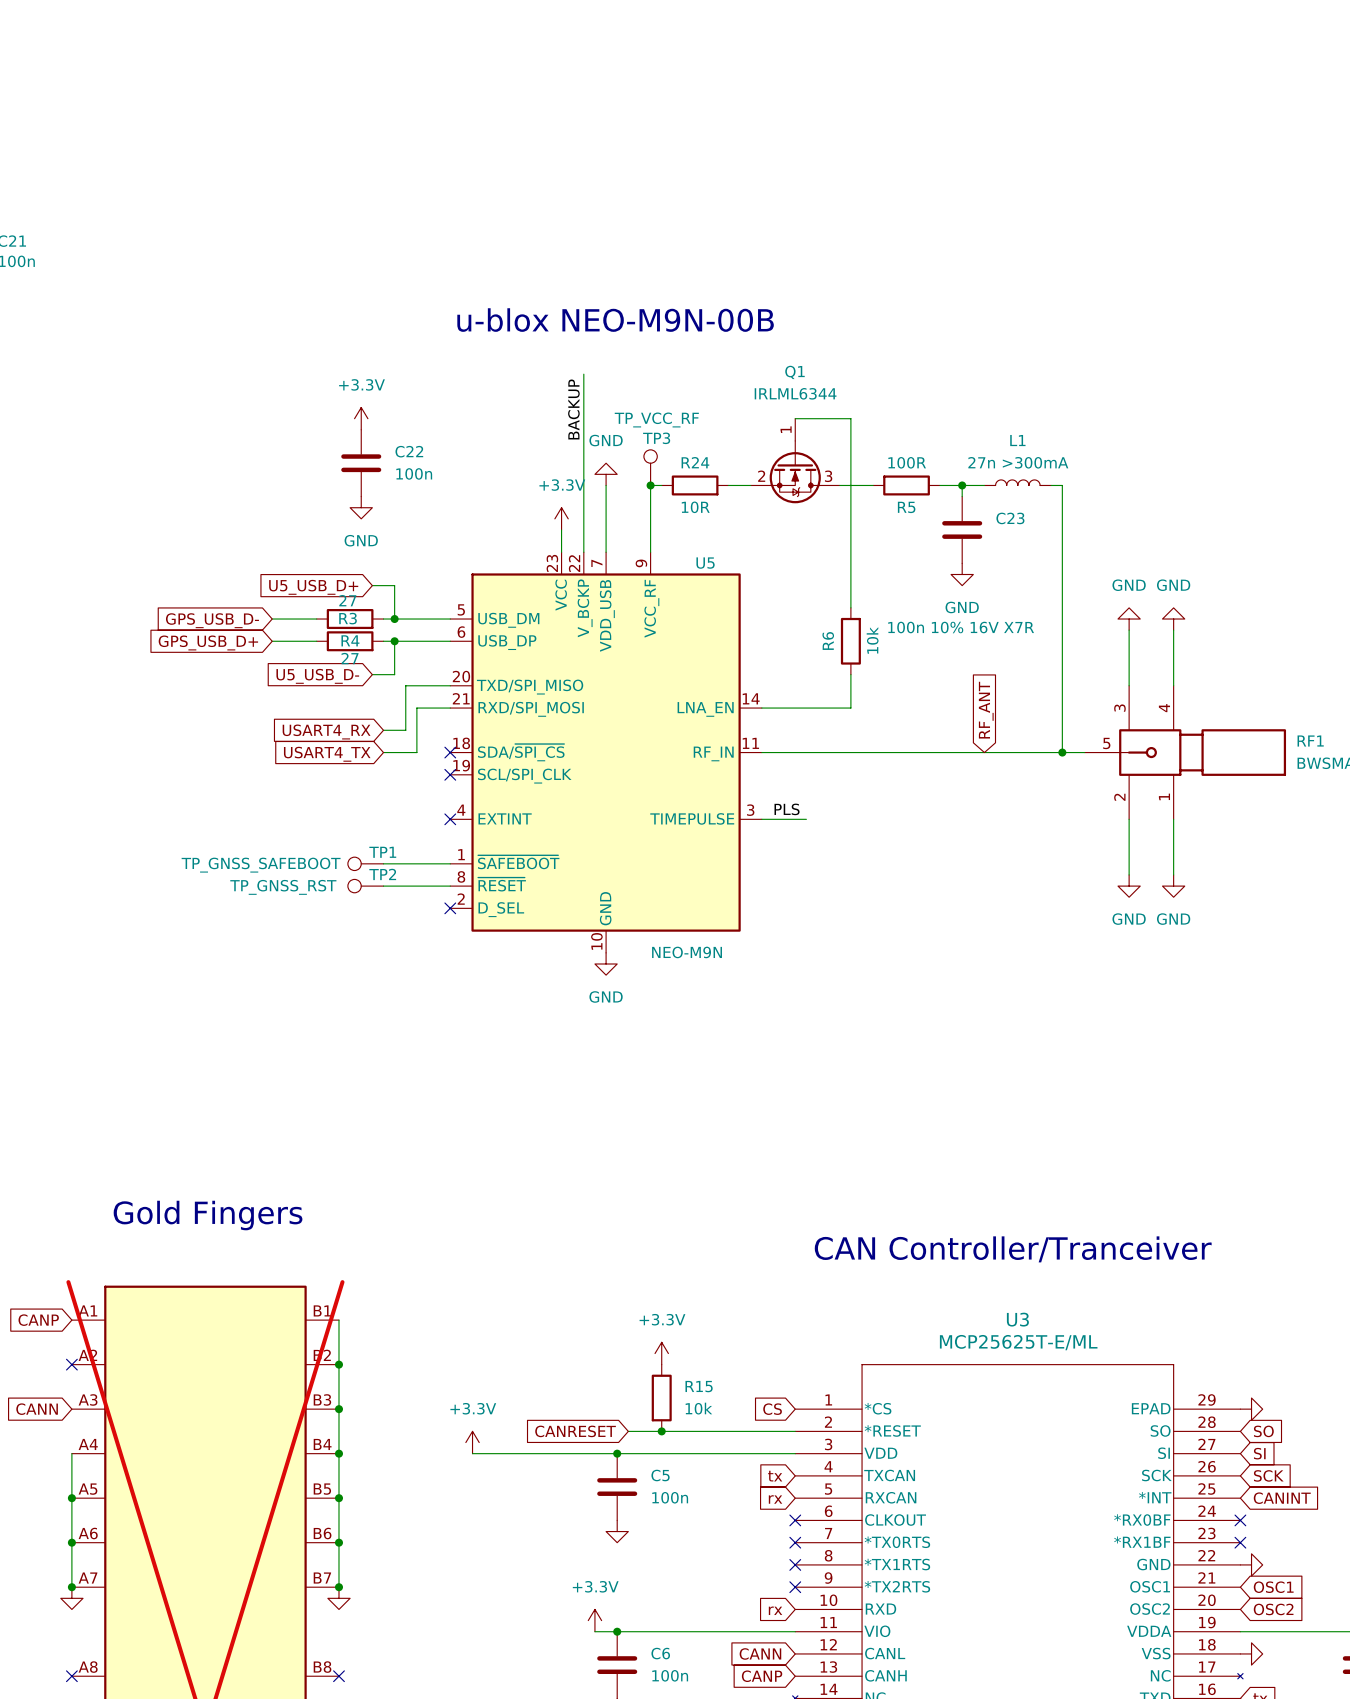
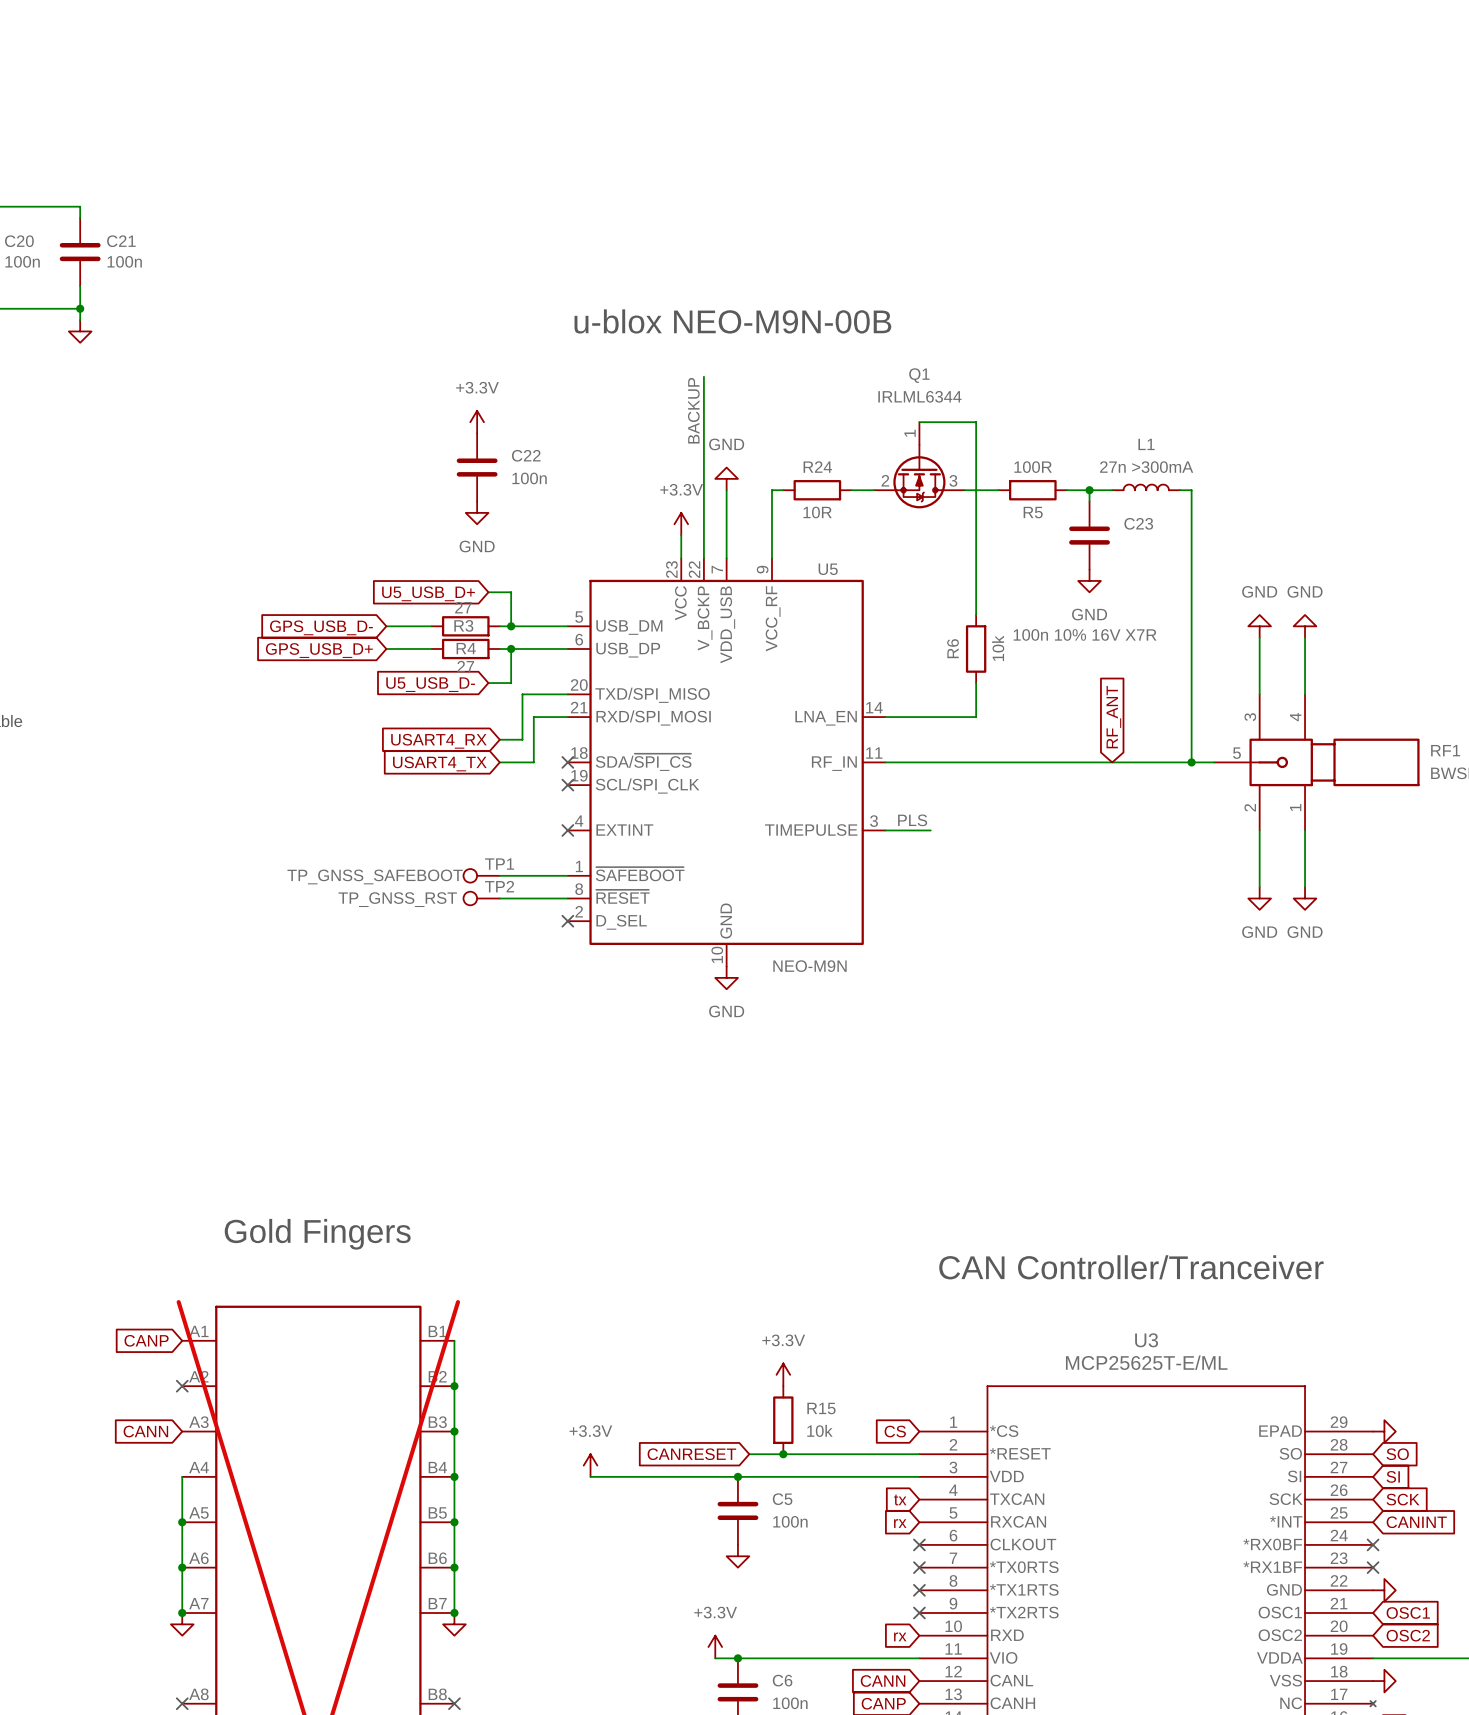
TP3: TP_VCC_RF (650, 467) -> none
junction: (650, 485) -> none

